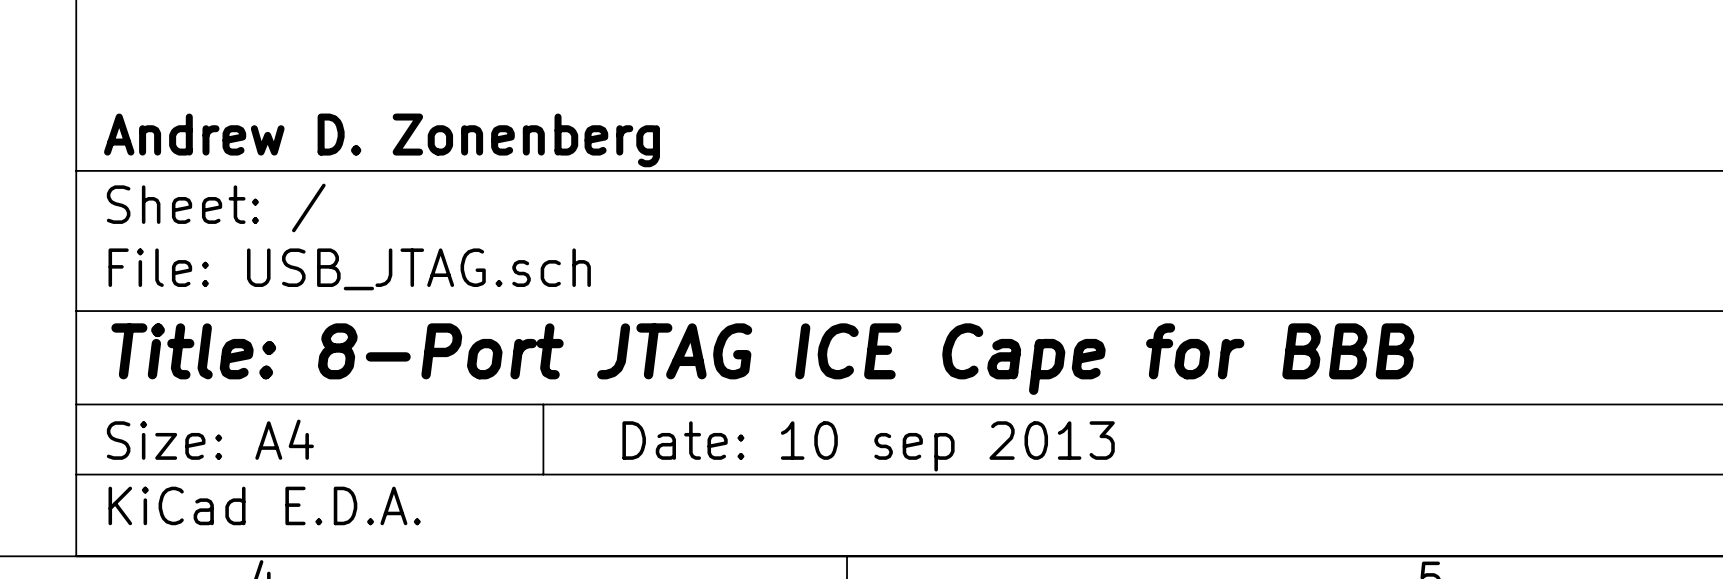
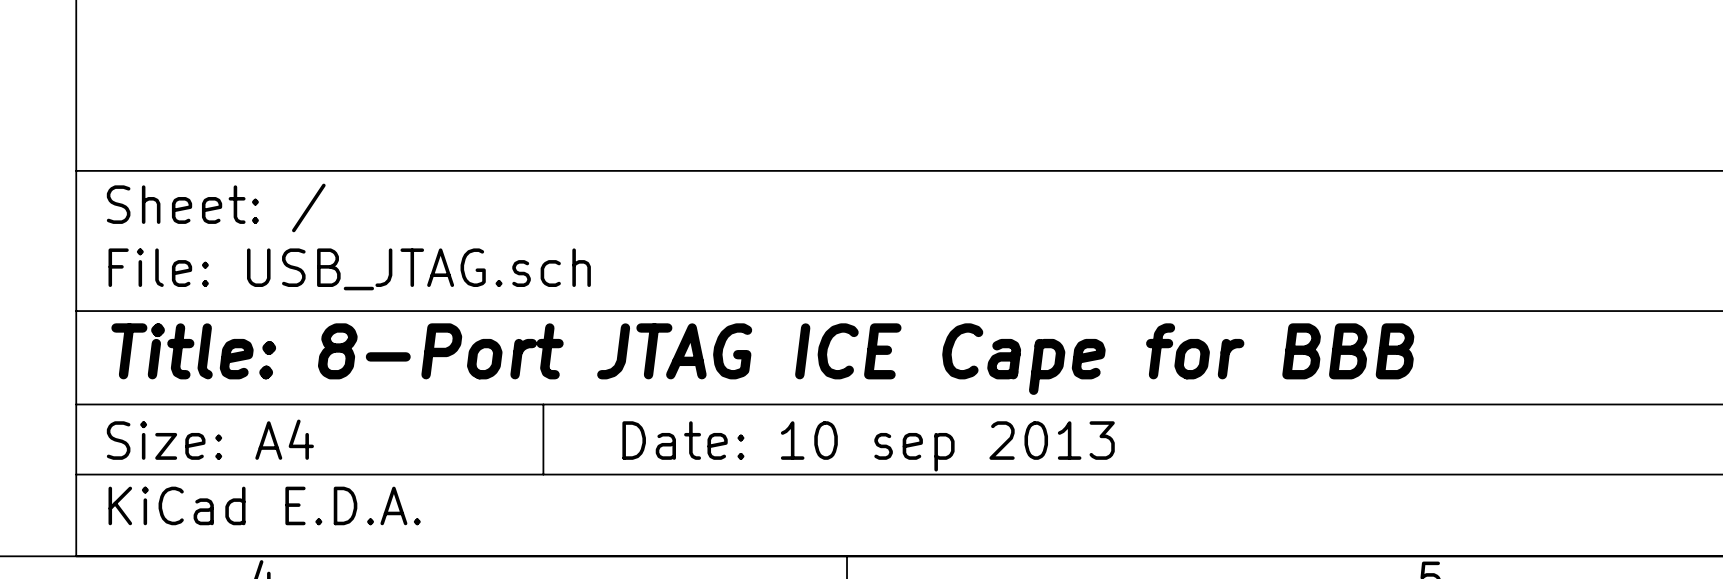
title block: Andrew D. Zonenberg (382, 140) -> none

